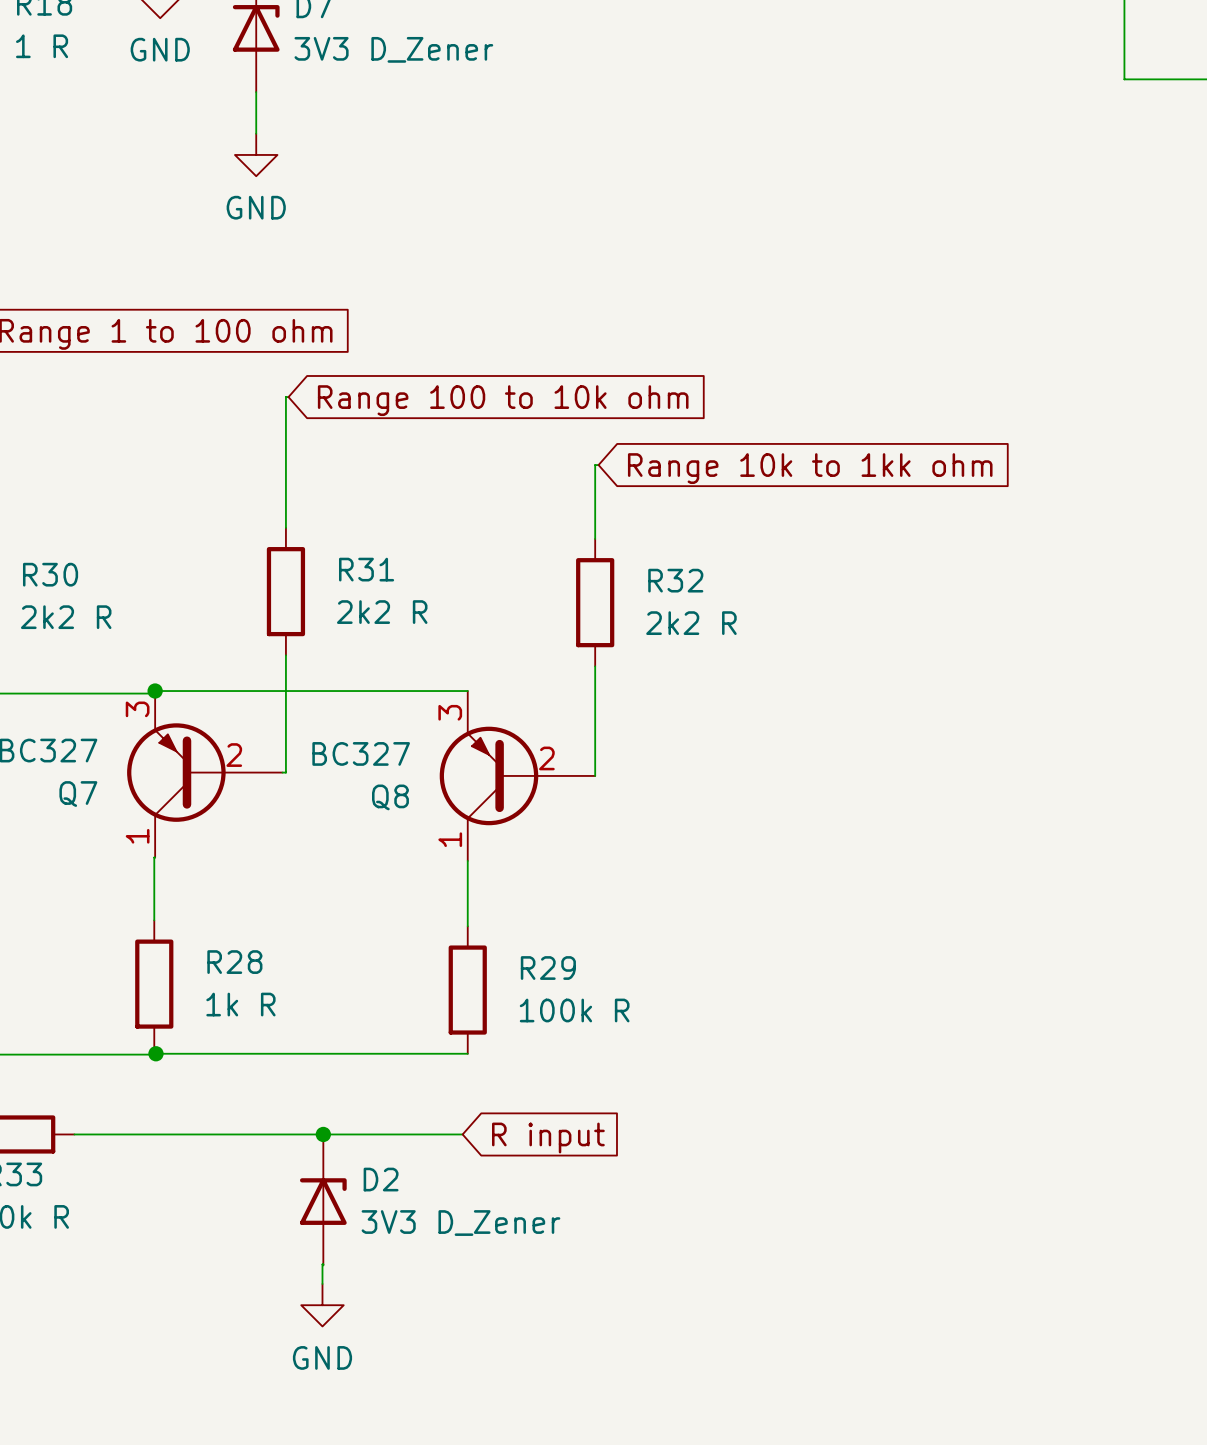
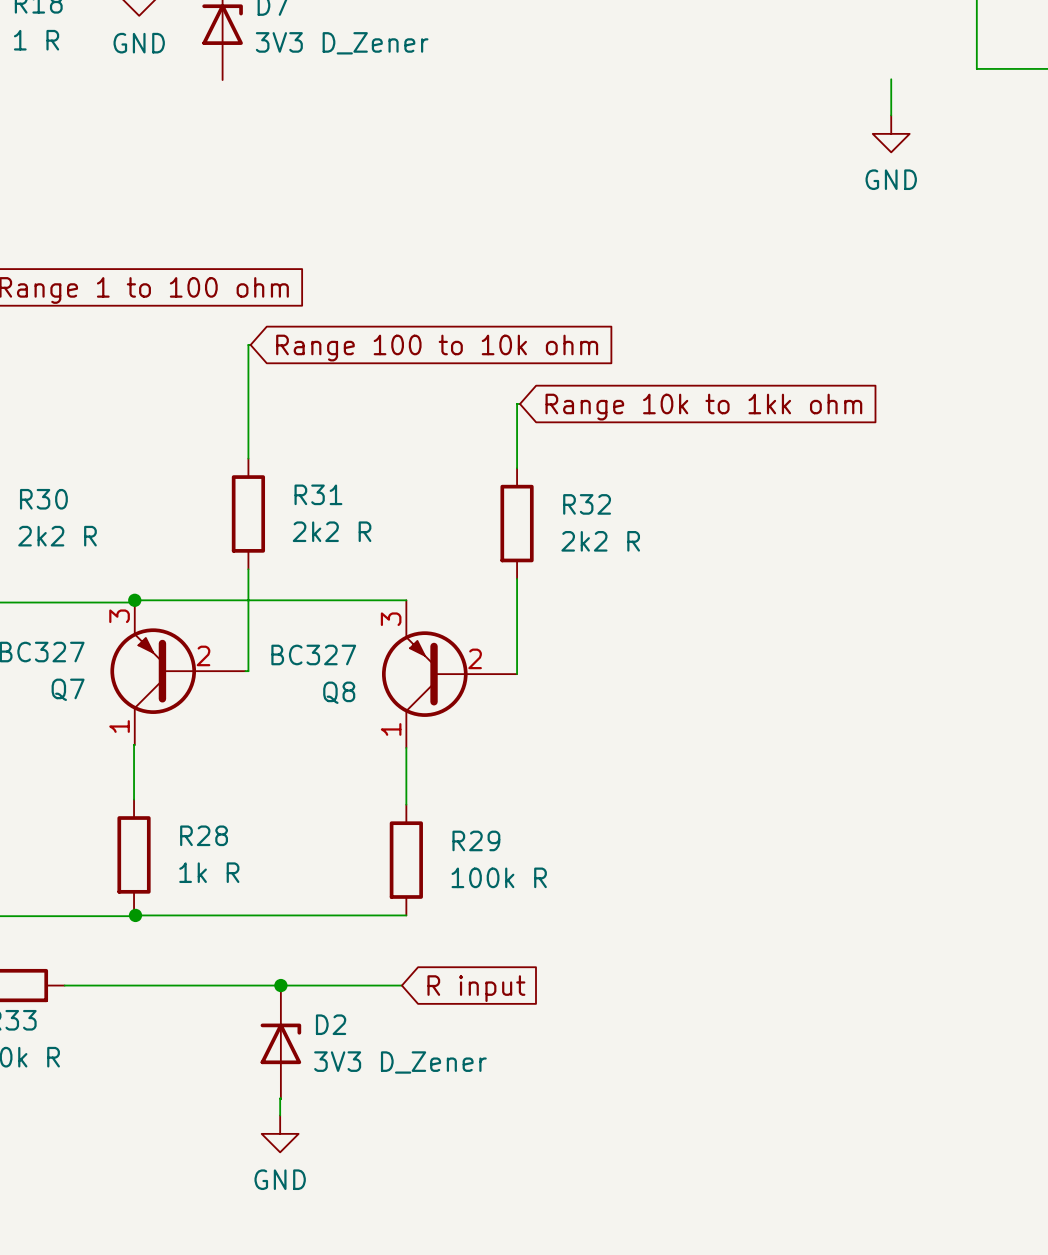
wire: none -> (891, 79) (891, 115)
wire: (256, 92) (256, 133) -> none
power symbol: GND (256, 154) -> none
power symbol: none -> GND (891, 133)

